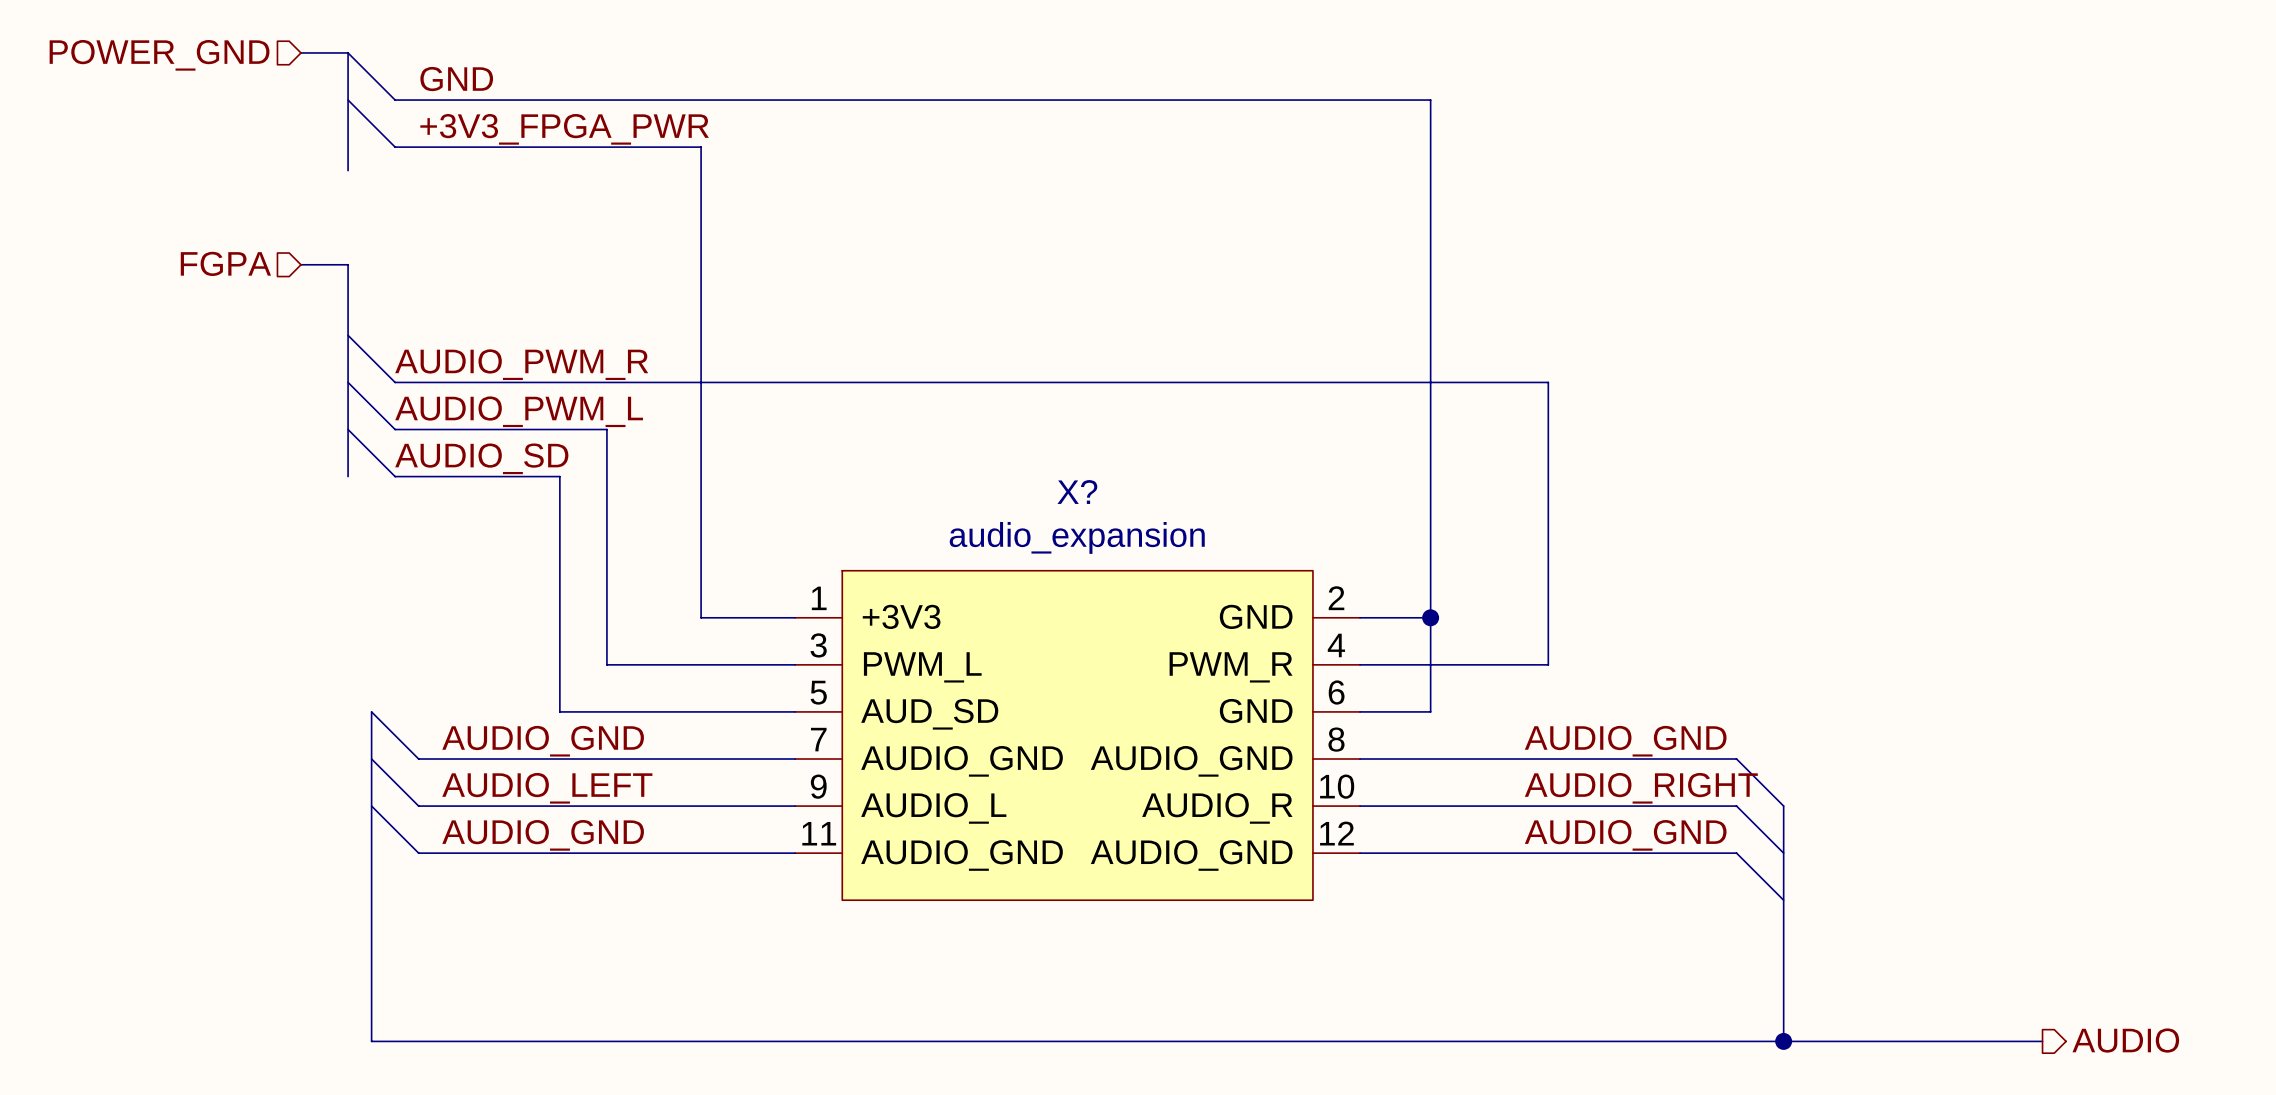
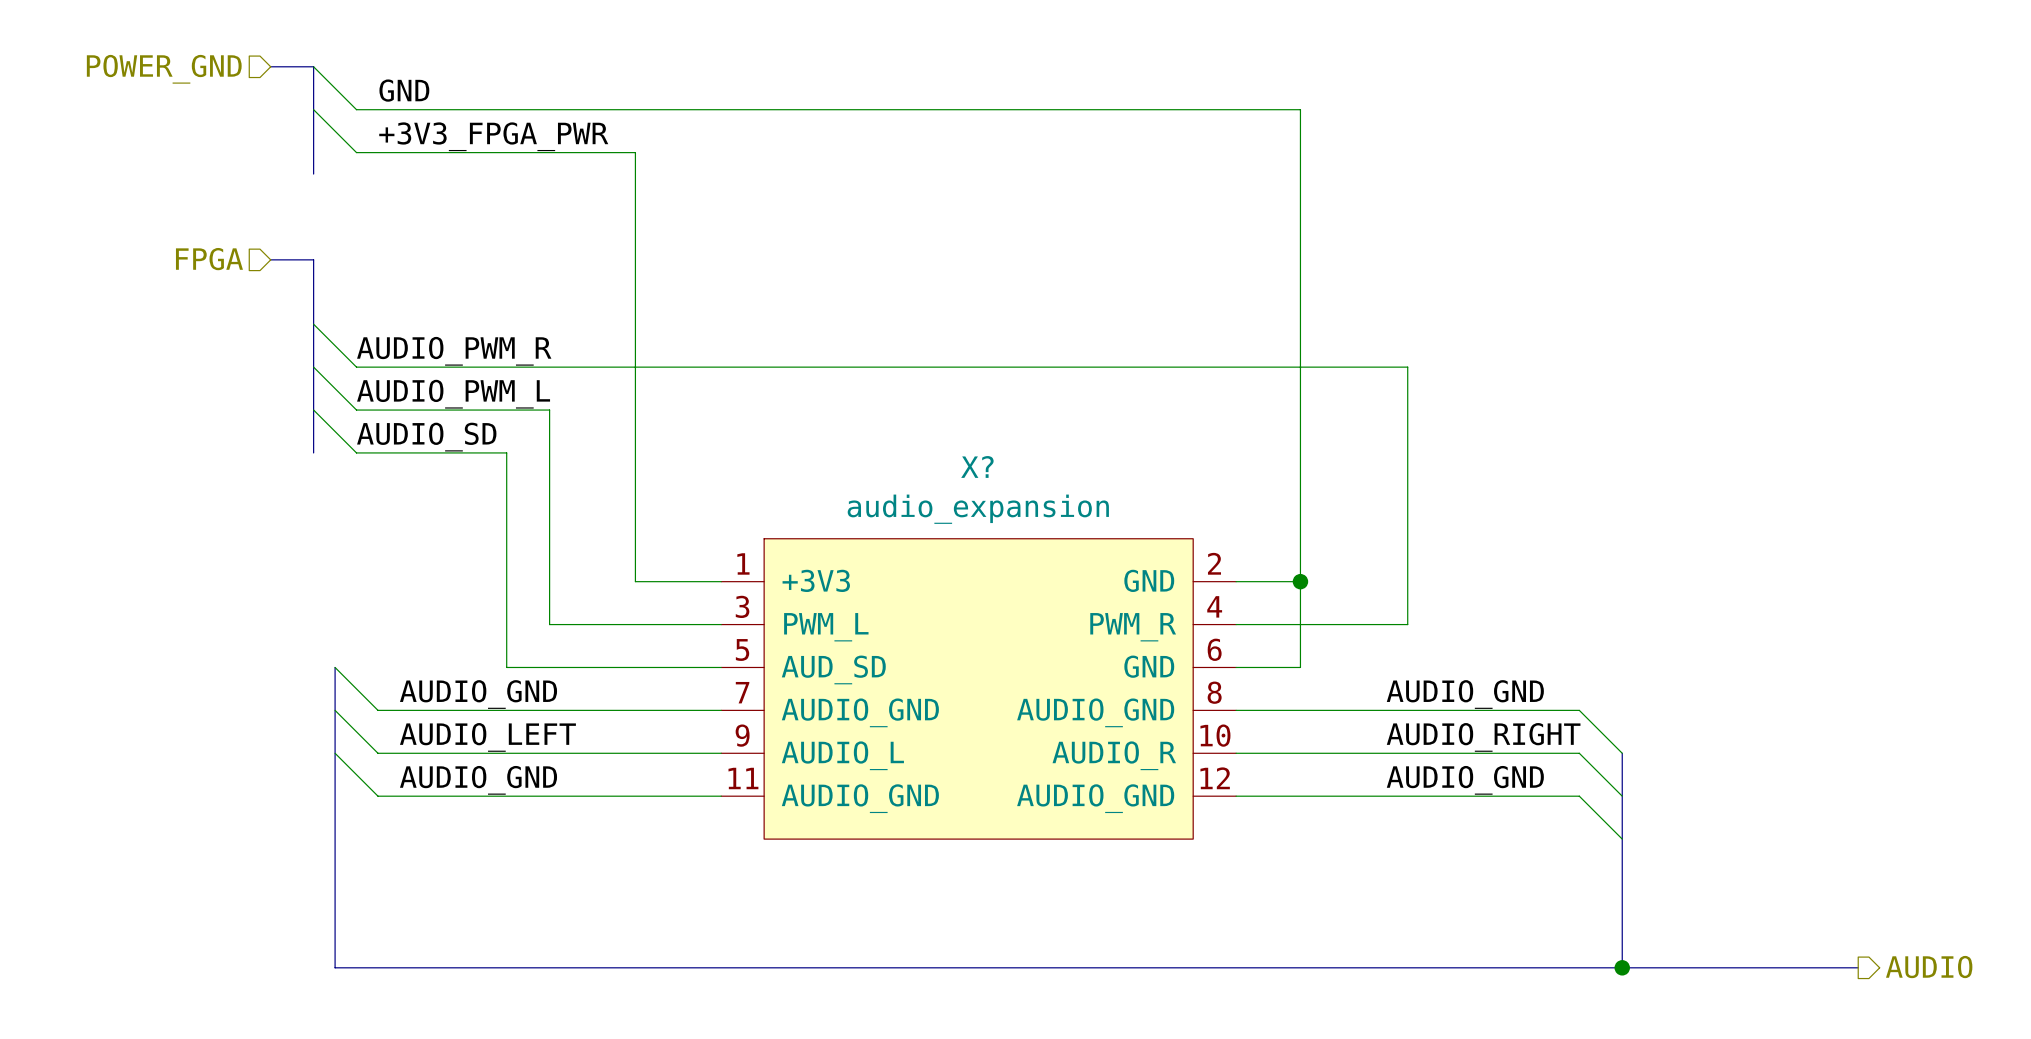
hierarchical label: FGPA (225, 263) -> FPGA (209, 259)

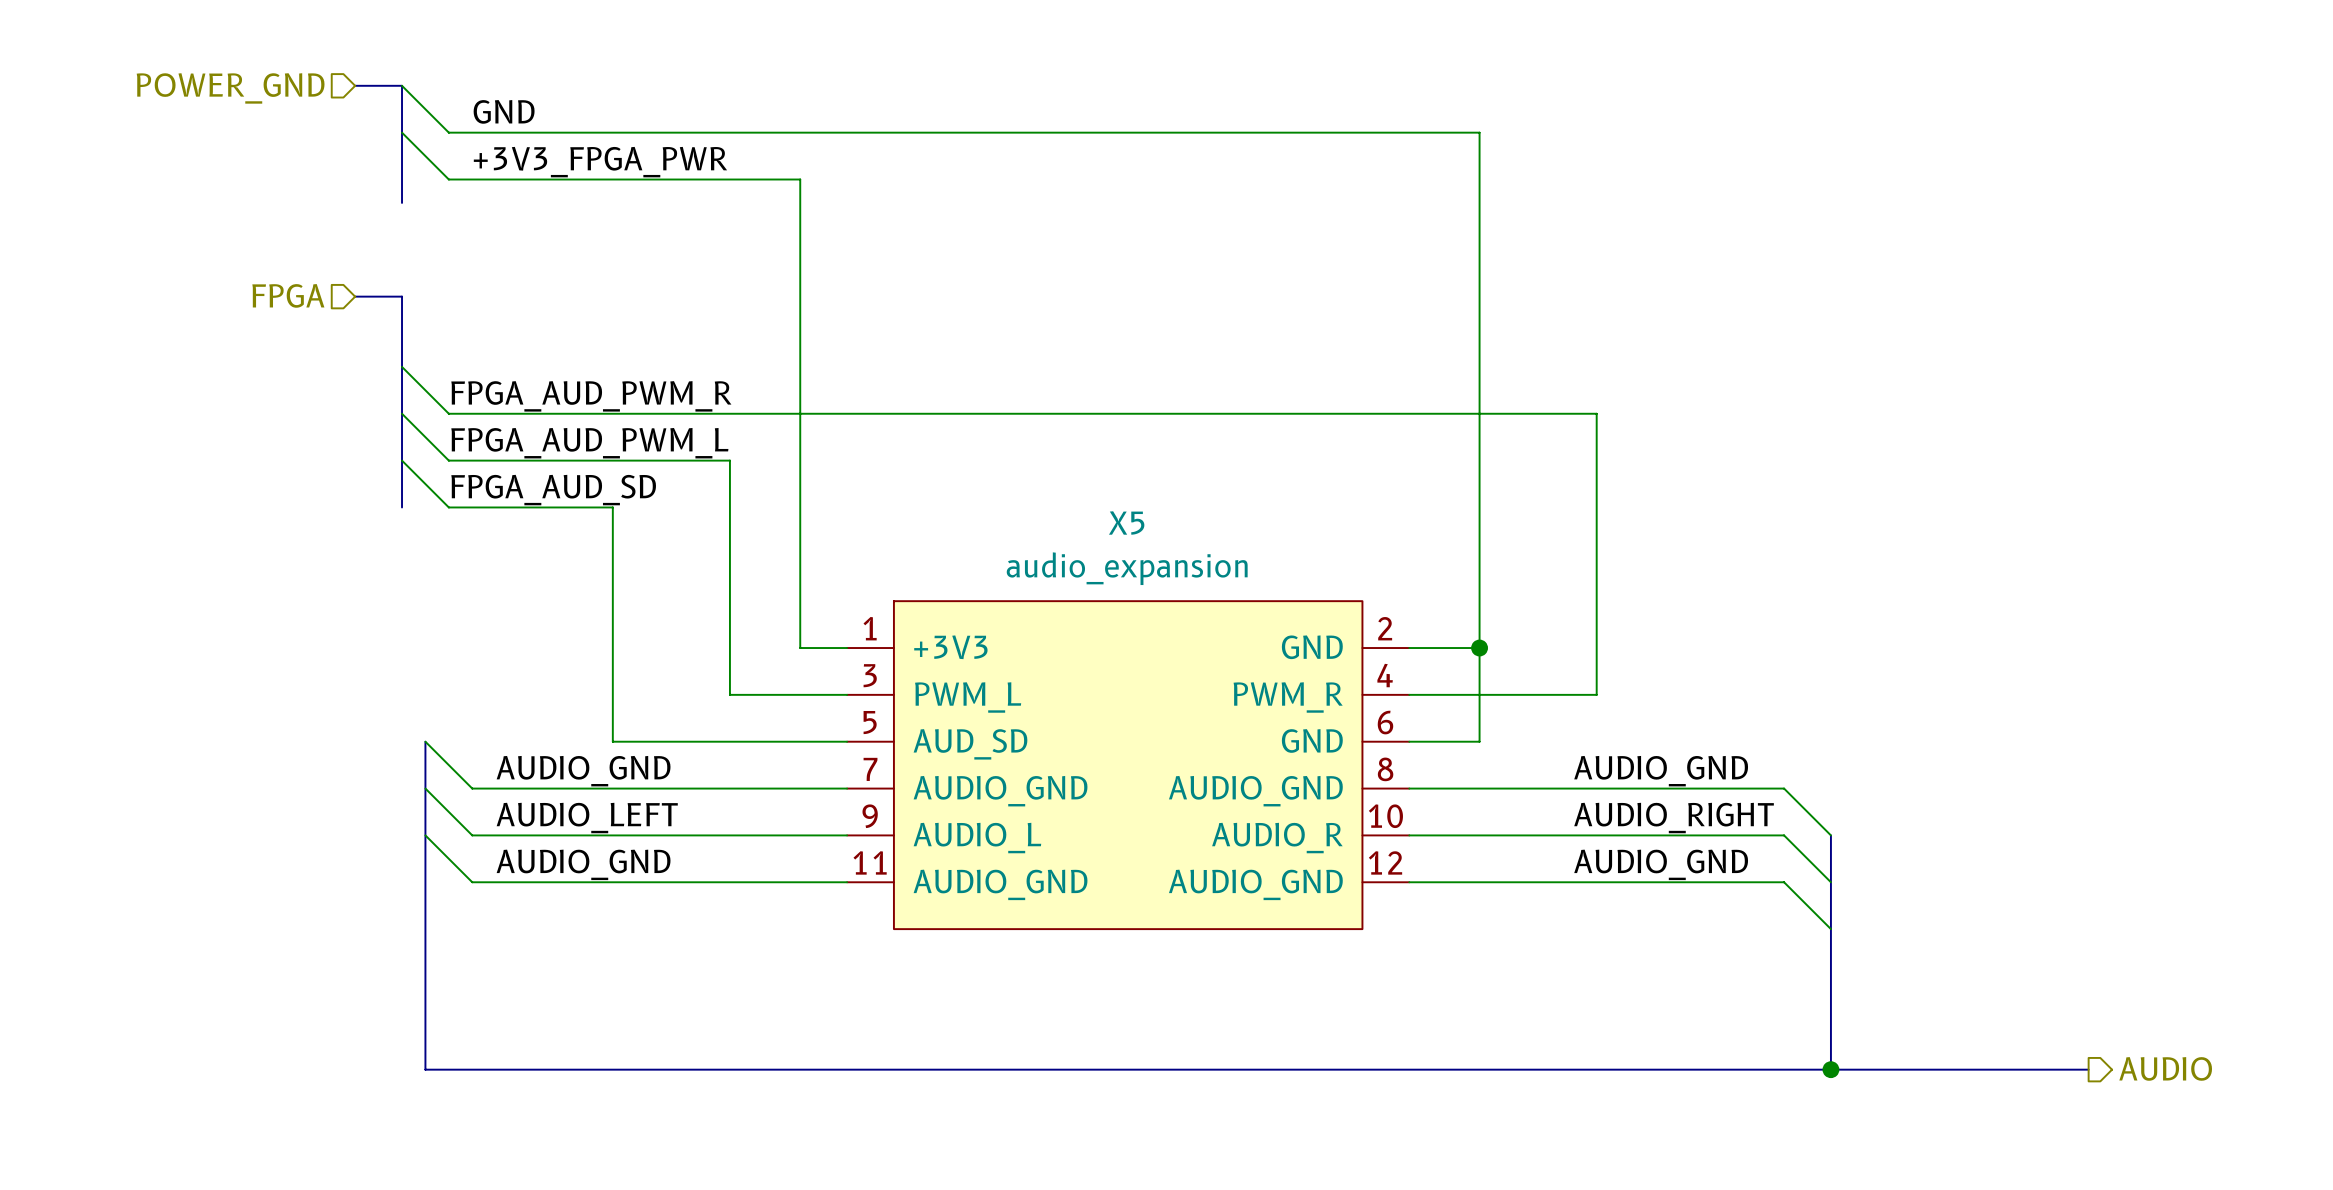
wire: (635, 152) (635, 581) (678, 581) -> (753, 179) (800, 179) (800, 648)
label: AUDIO_PWM_R (454, 351) -> FPGA_AUD_PWM_R (591, 396)
label: AUDIO_PWM_L (453, 394) -> FPGA_AUD_PWM_L (589, 443)
wire: (549, 410) (549, 624) (613, 624) -> (659, 460) (729, 460) (729, 694)
label: AUDIO_SD (426, 437) -> FPGA_AUD_SD (553, 490)
X? name: X? (977, 466) -> X5 (1126, 522)

